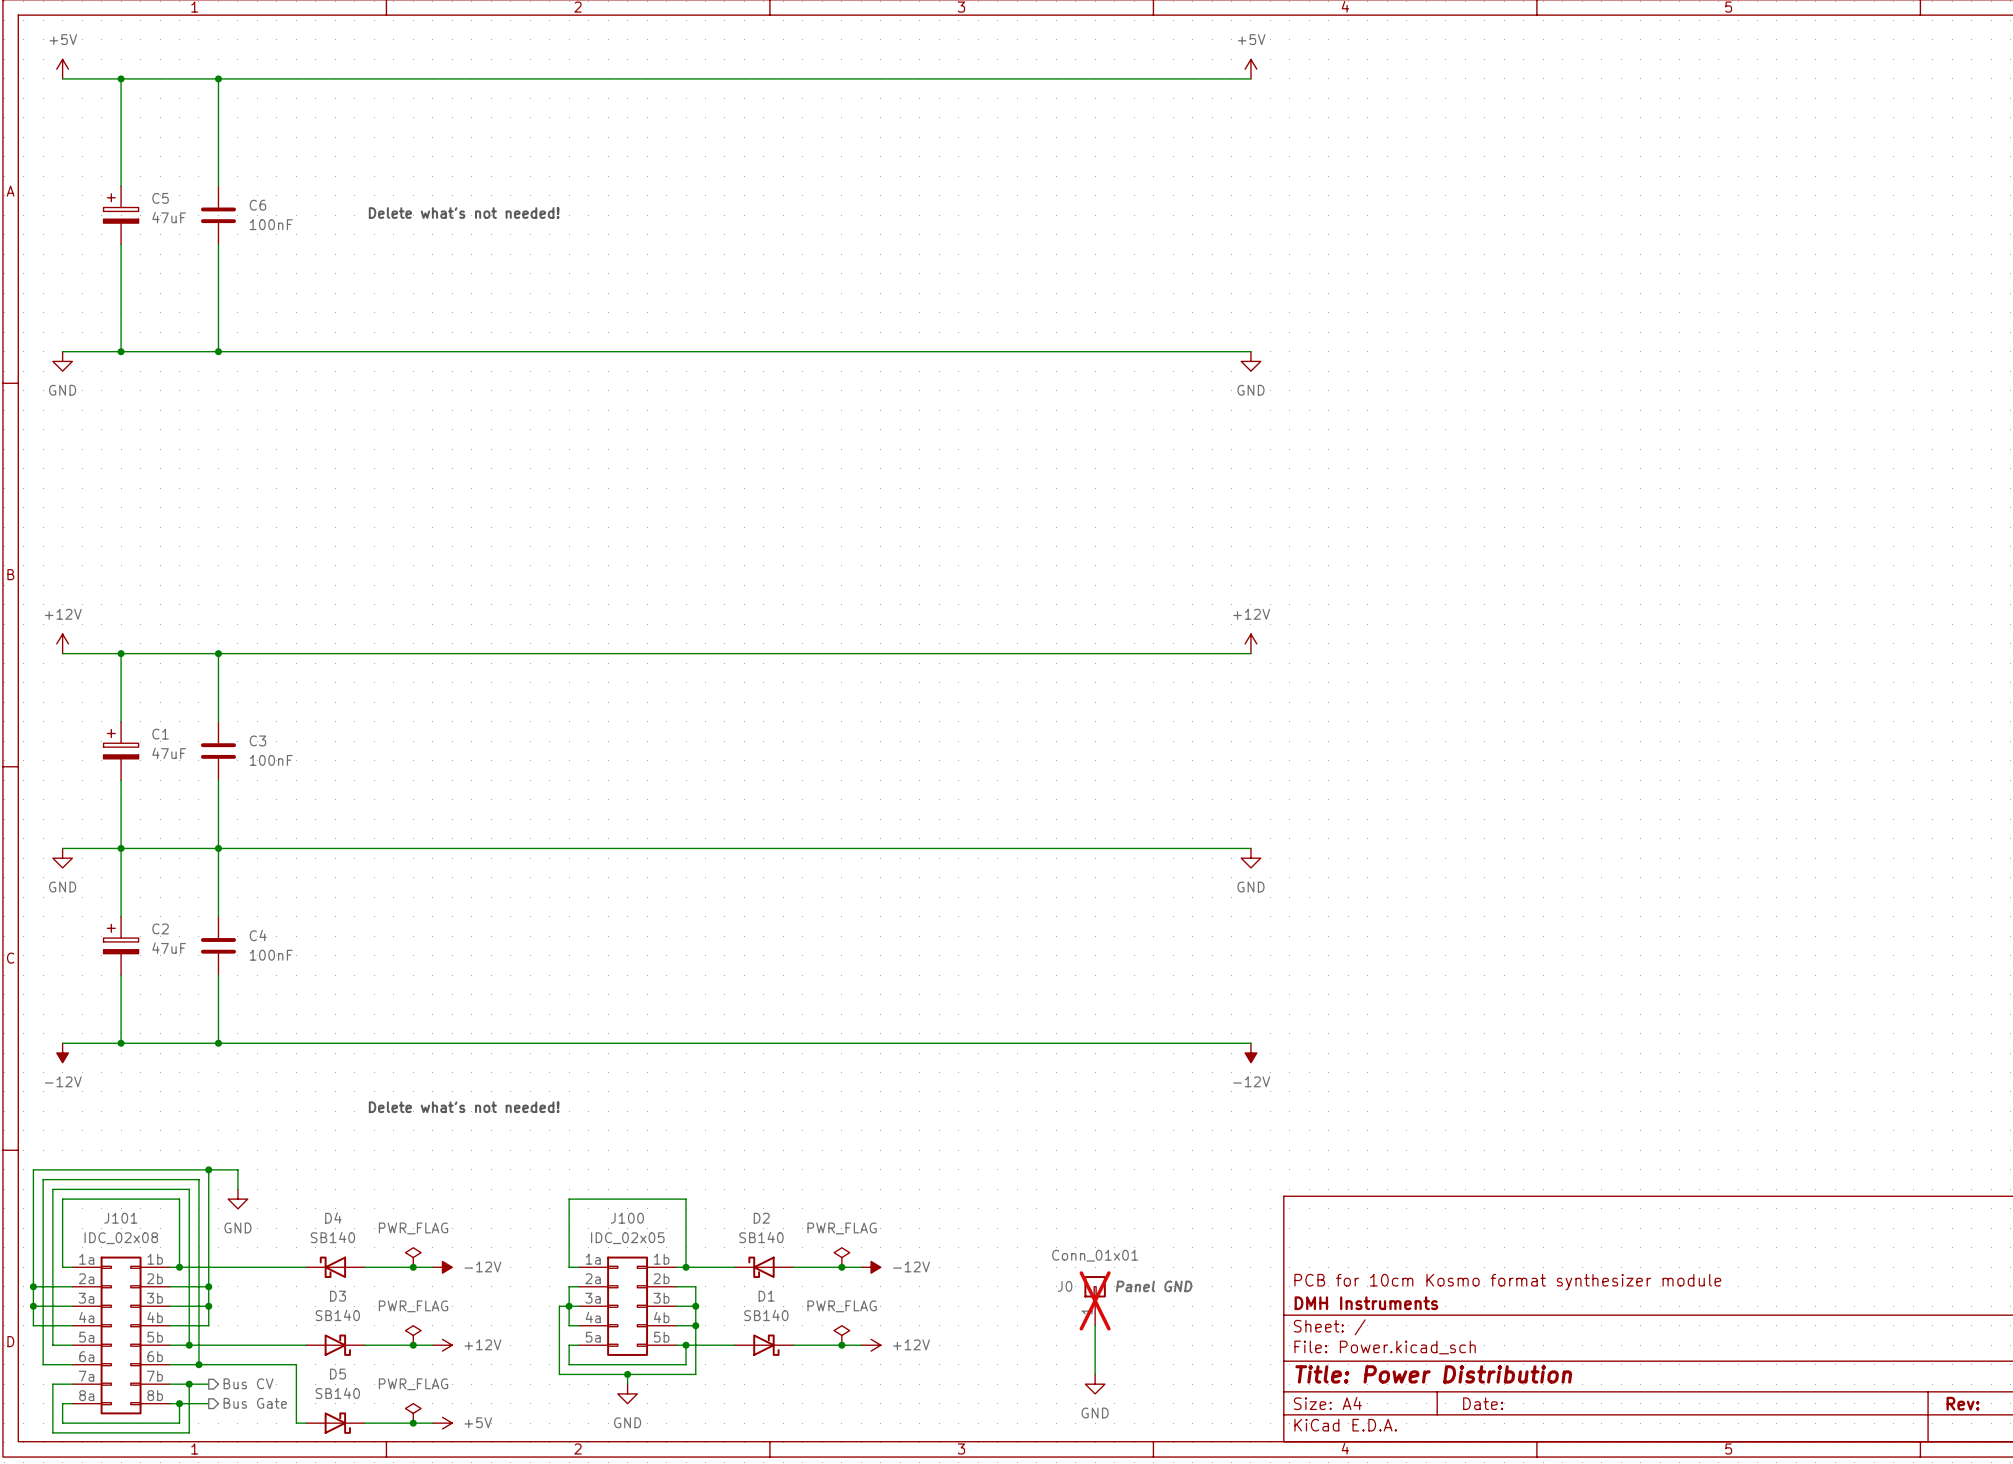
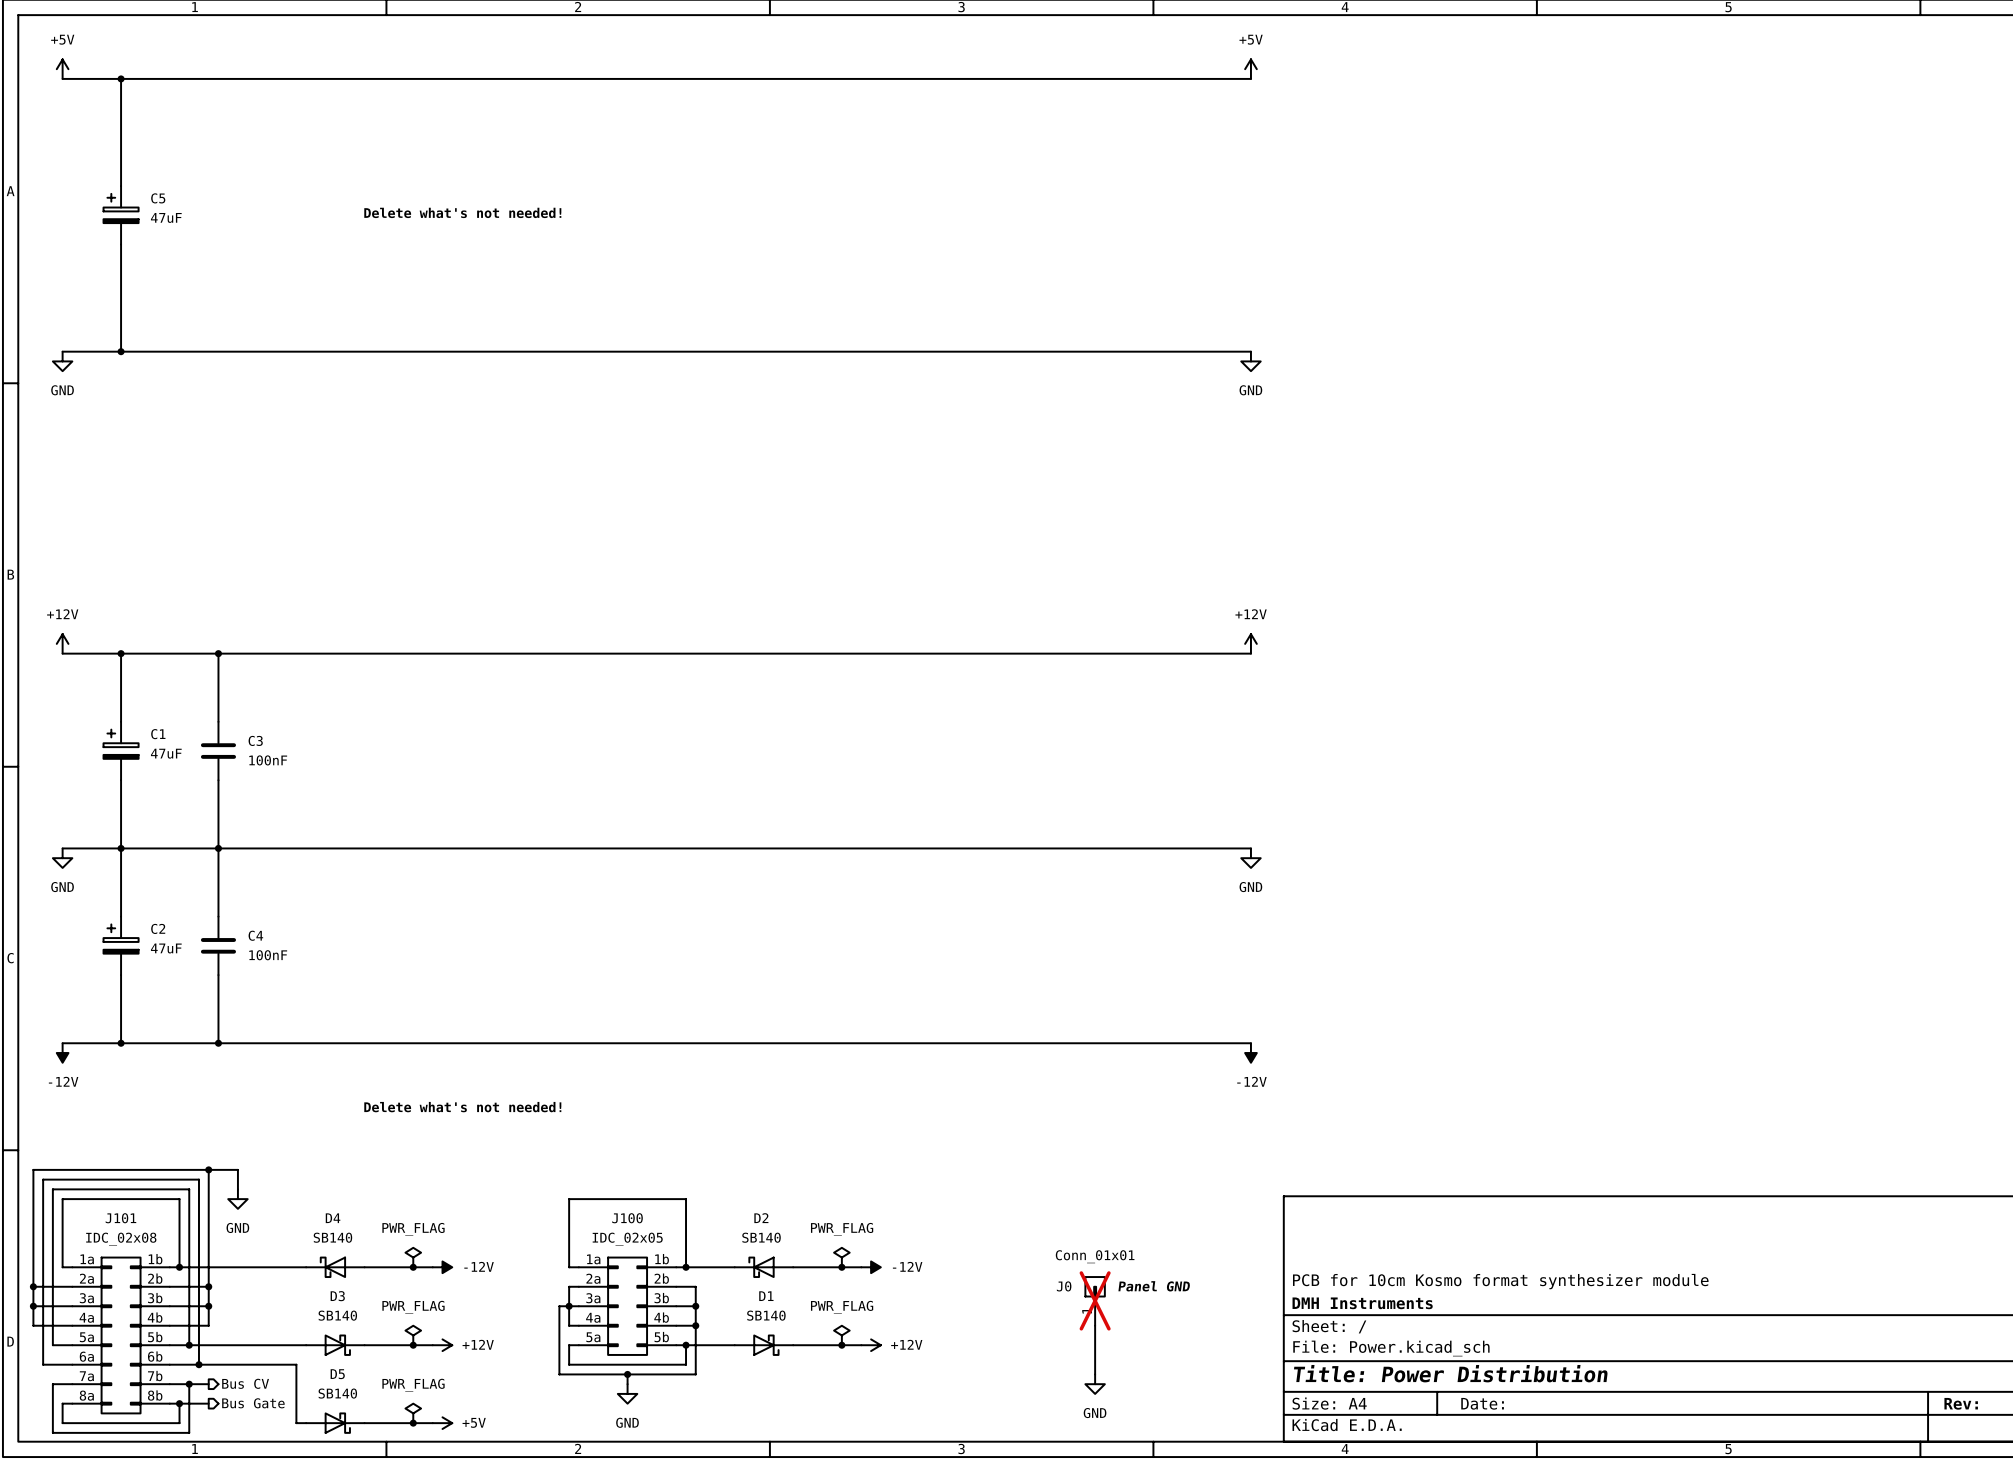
wire: (218, 78) (218, 186) -> none
junction: (218, 78) -> none
C6: 100nF (218, 215) -> none
wire: (218, 244) (218, 351) -> none
junction: (218, 351) -> none

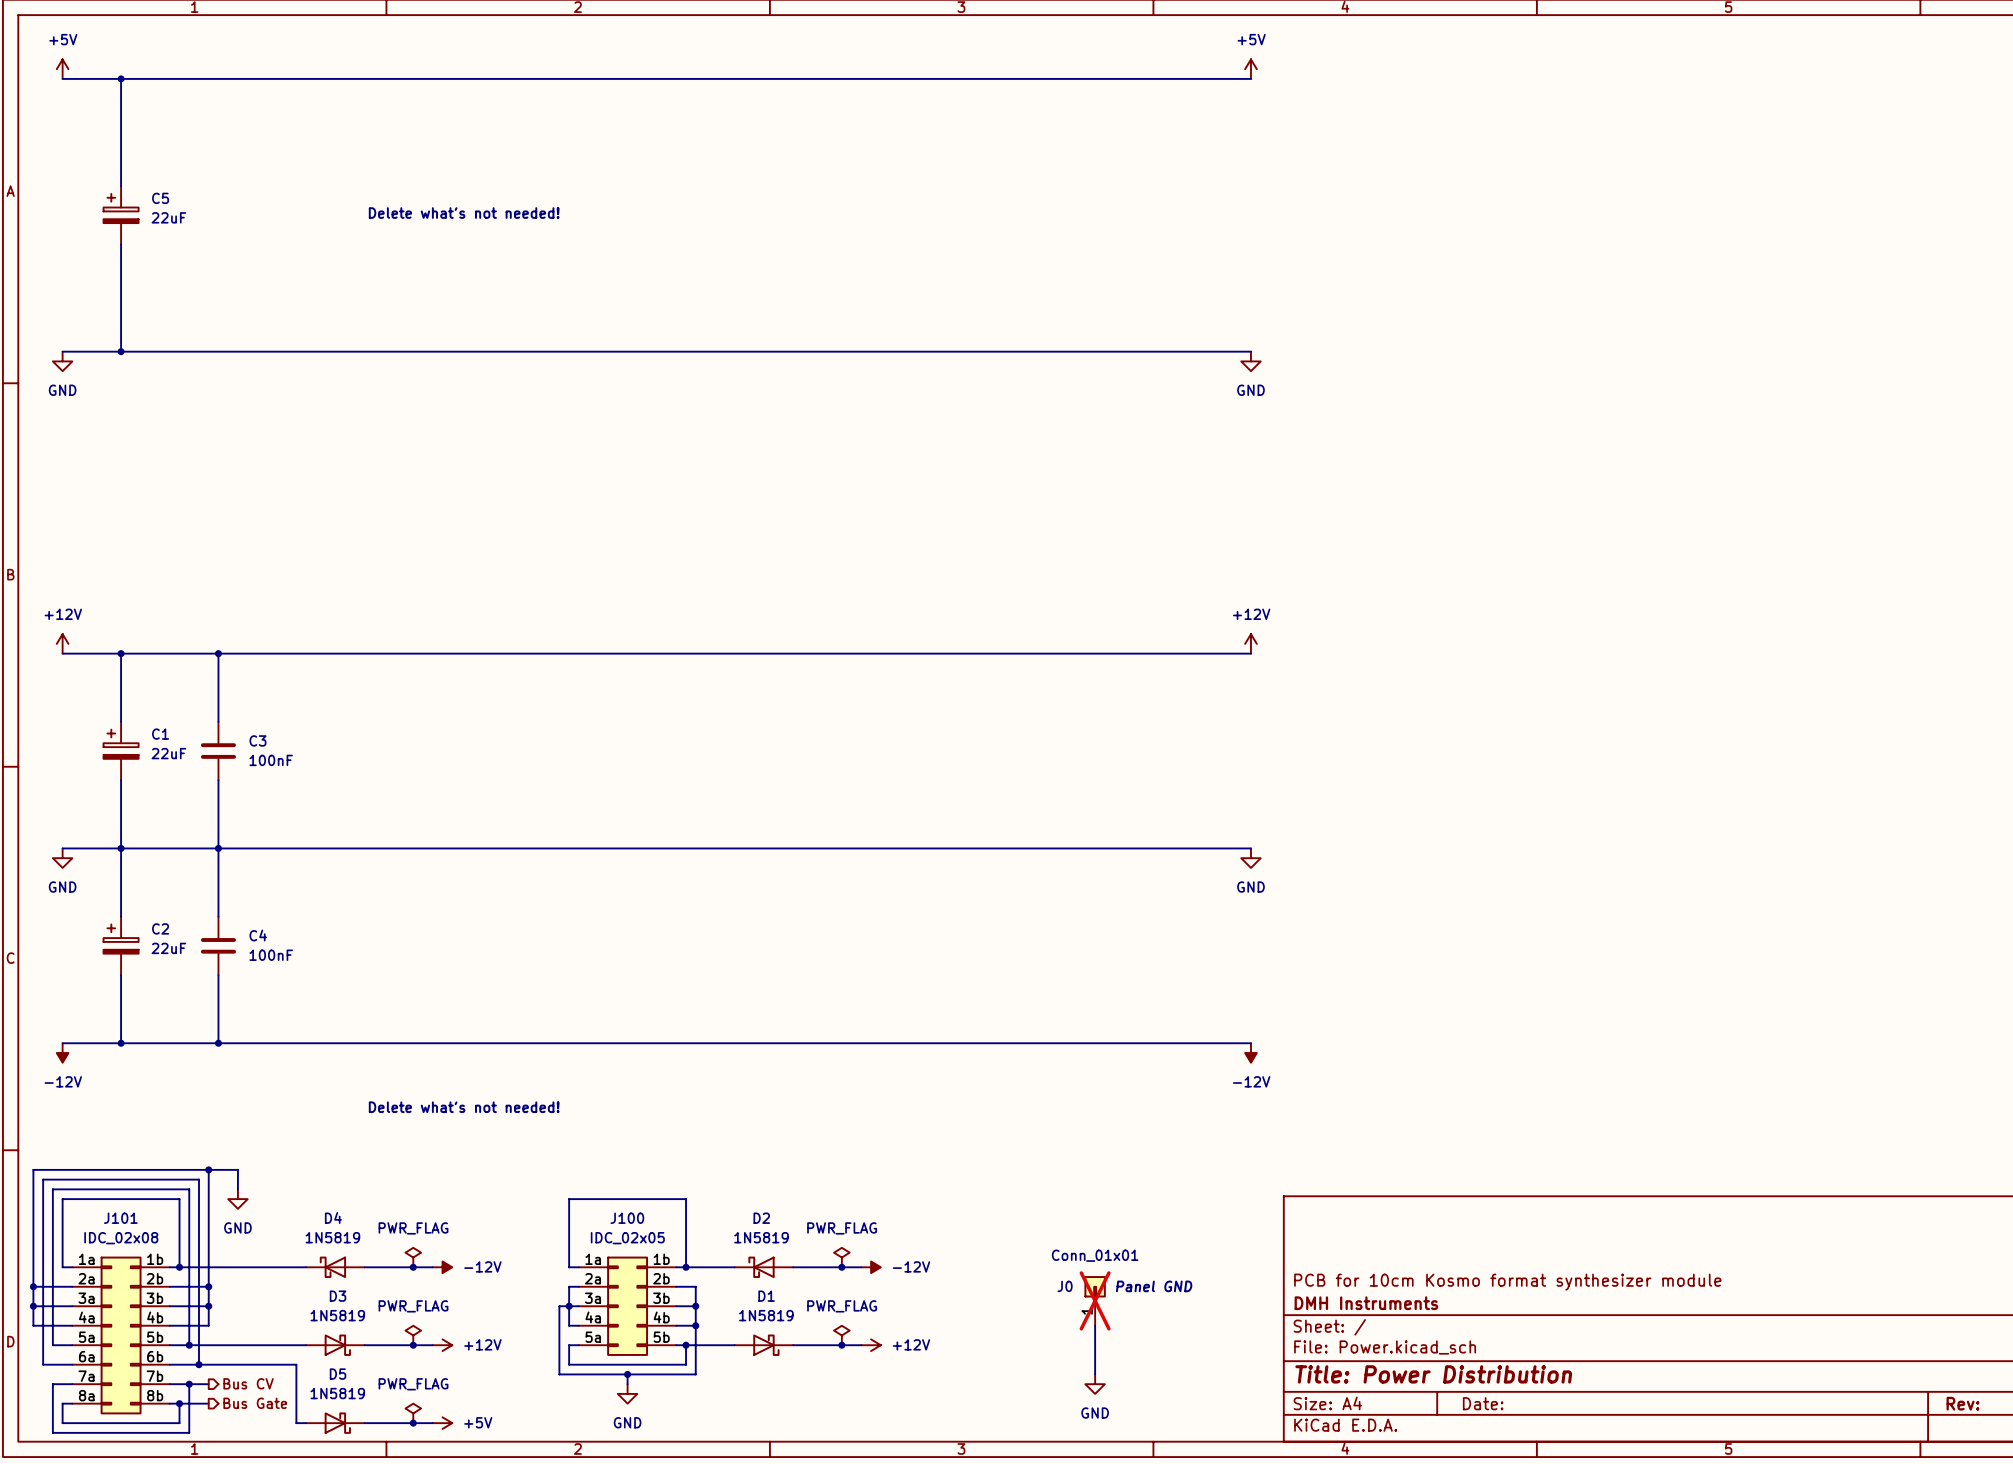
C5 value: 47uF (166, 217) -> 22uF (168, 217)
C1 value: 47uF (166, 753) -> 22uF (168, 753)
C2 value: 47uF (166, 948) -> 22uF (168, 948)
D4 value: SB140 (332, 1237) -> 1N5819 (332, 1237)
D2 value: SB140 (761, 1237) -> 1N5819 (761, 1237)
D3 value: SB140 (337, 1315) -> 1N5819 (337, 1315)
D1 value: SB140 (766, 1315) -> 1N5819 (766, 1315)
D5 value: SB140 (337, 1393) -> 1N5819 (337, 1393)

